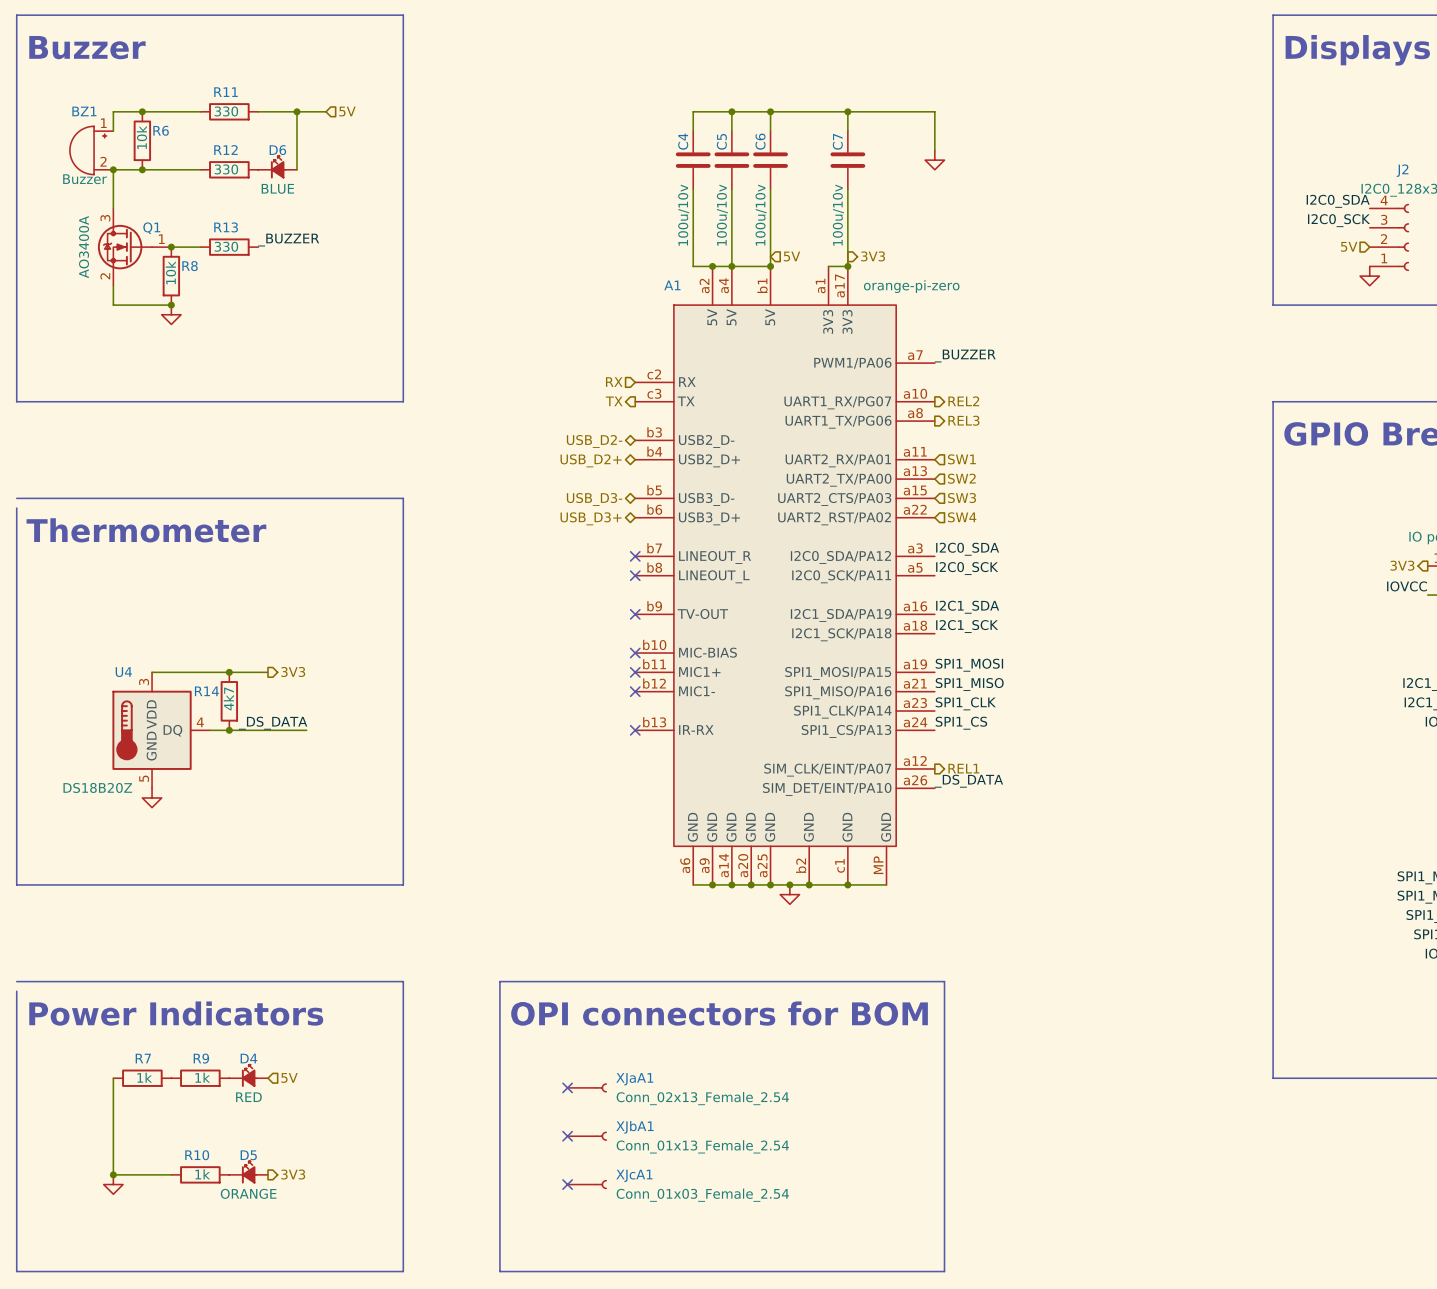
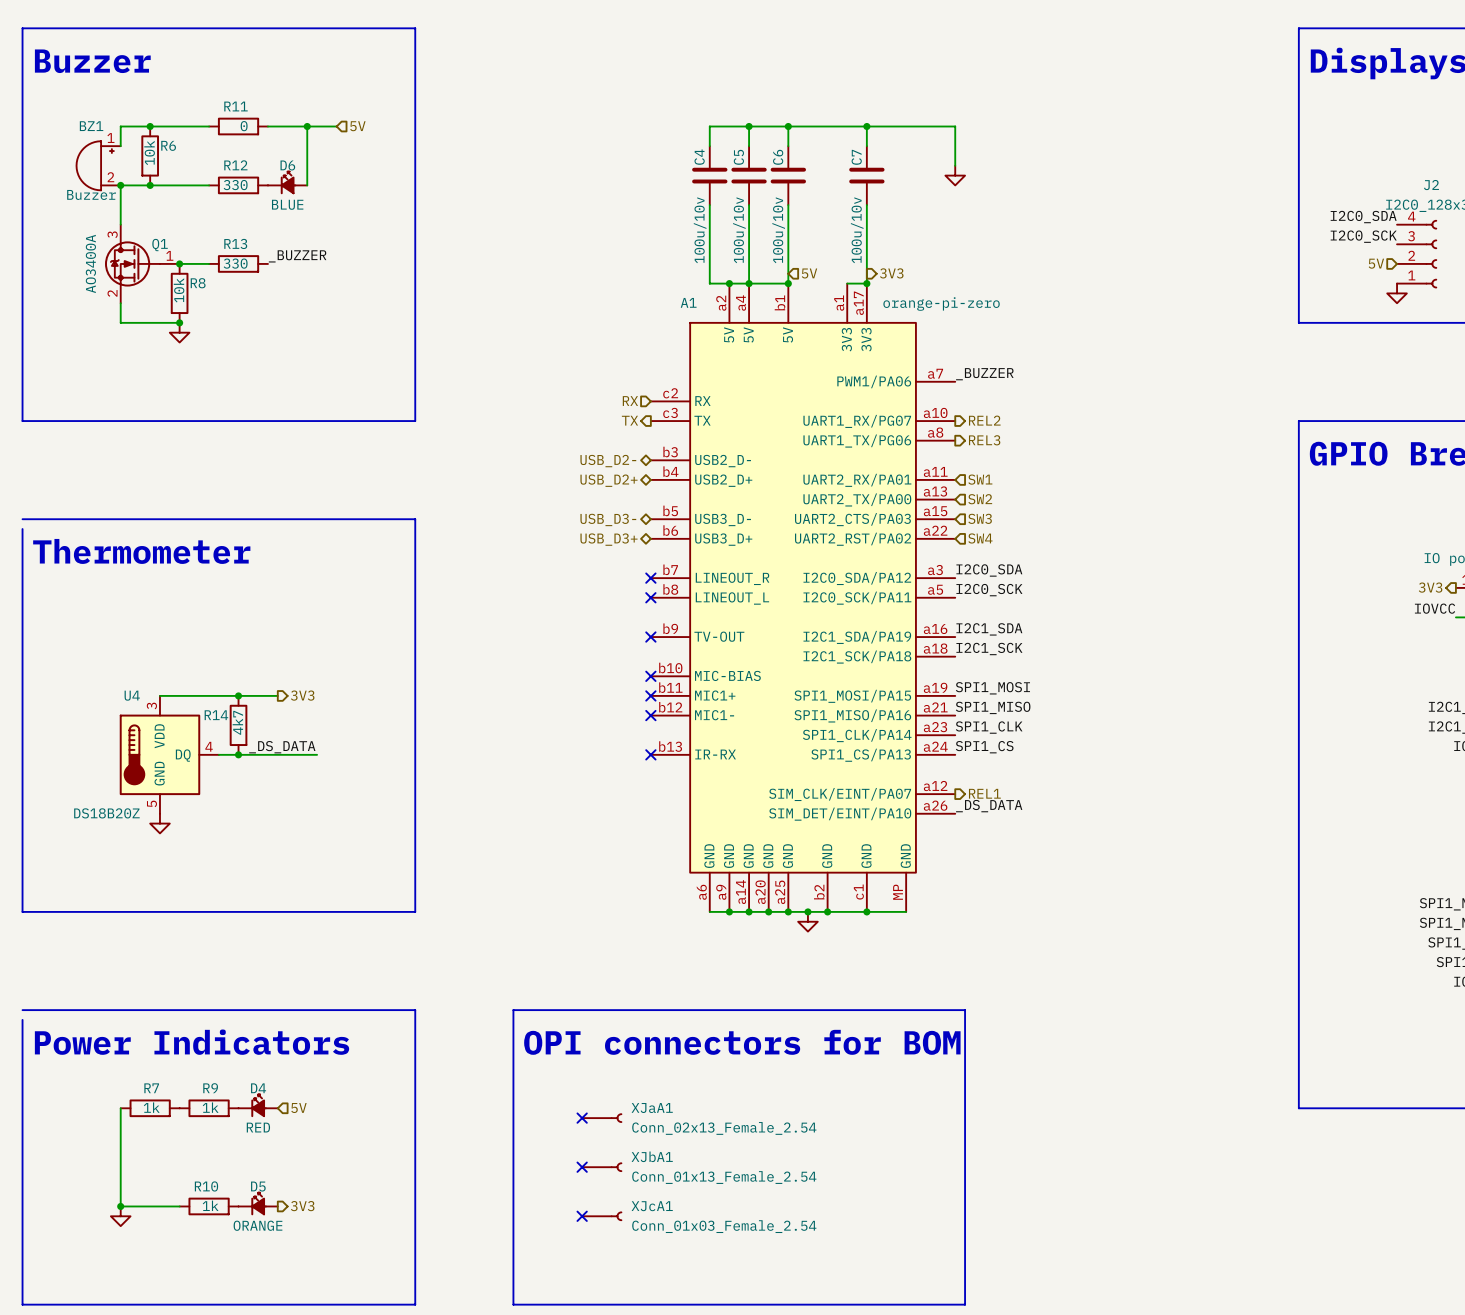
R11 value: 330 (226, 111) -> 0 (244, 126)

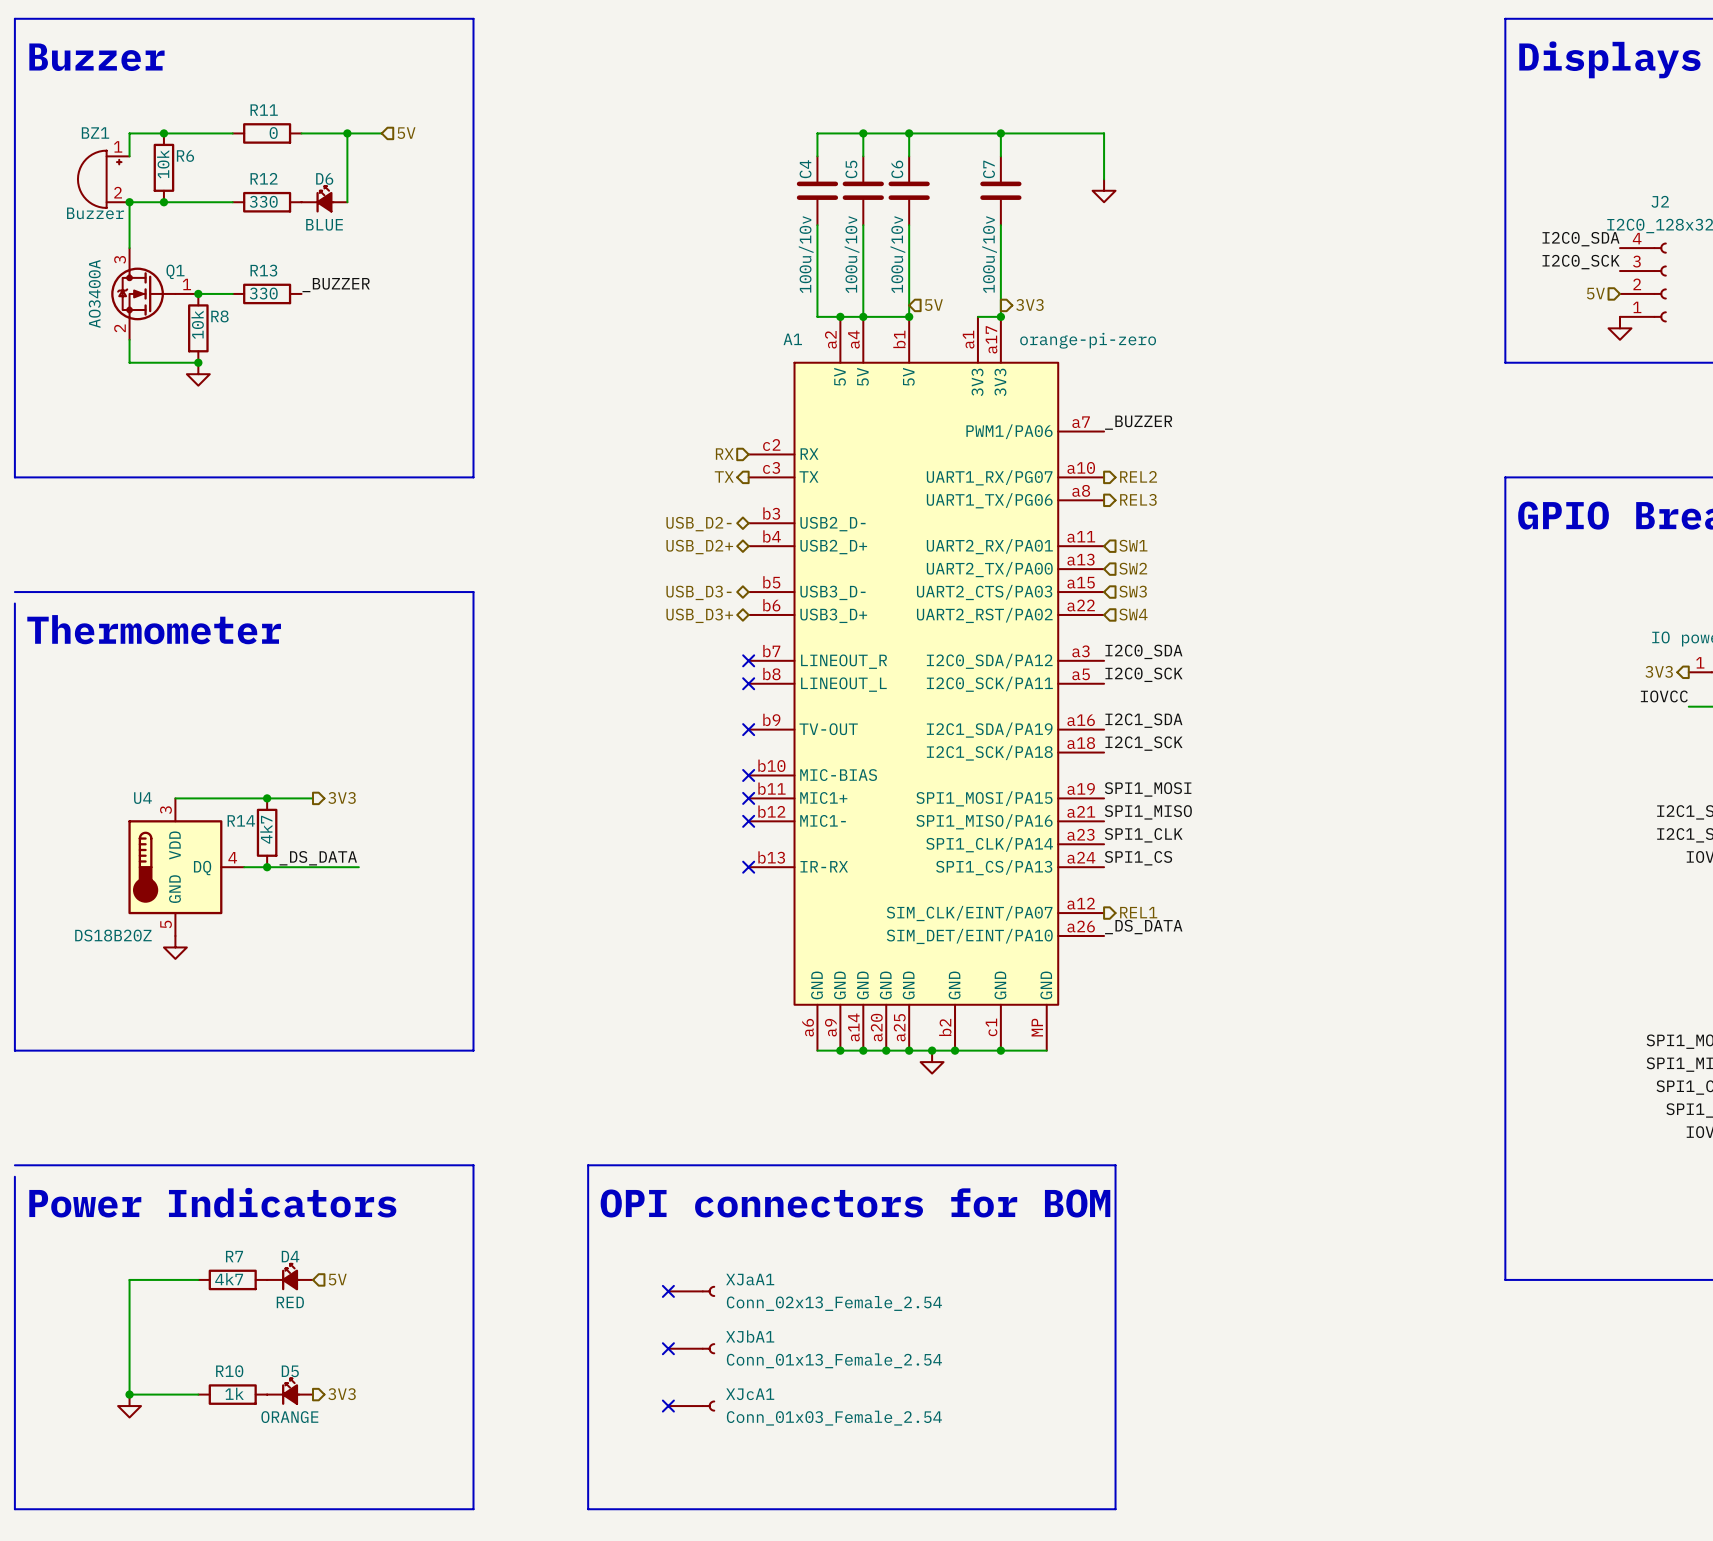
R9 name: R9 (210, 1088) -> R7 (234, 1256)
R9 value: 1k (210, 1107) -> 4k7 (229, 1279)
wire: none -> (129, 1279) (198, 1279)
R7: 1k (150, 1108) -> none

